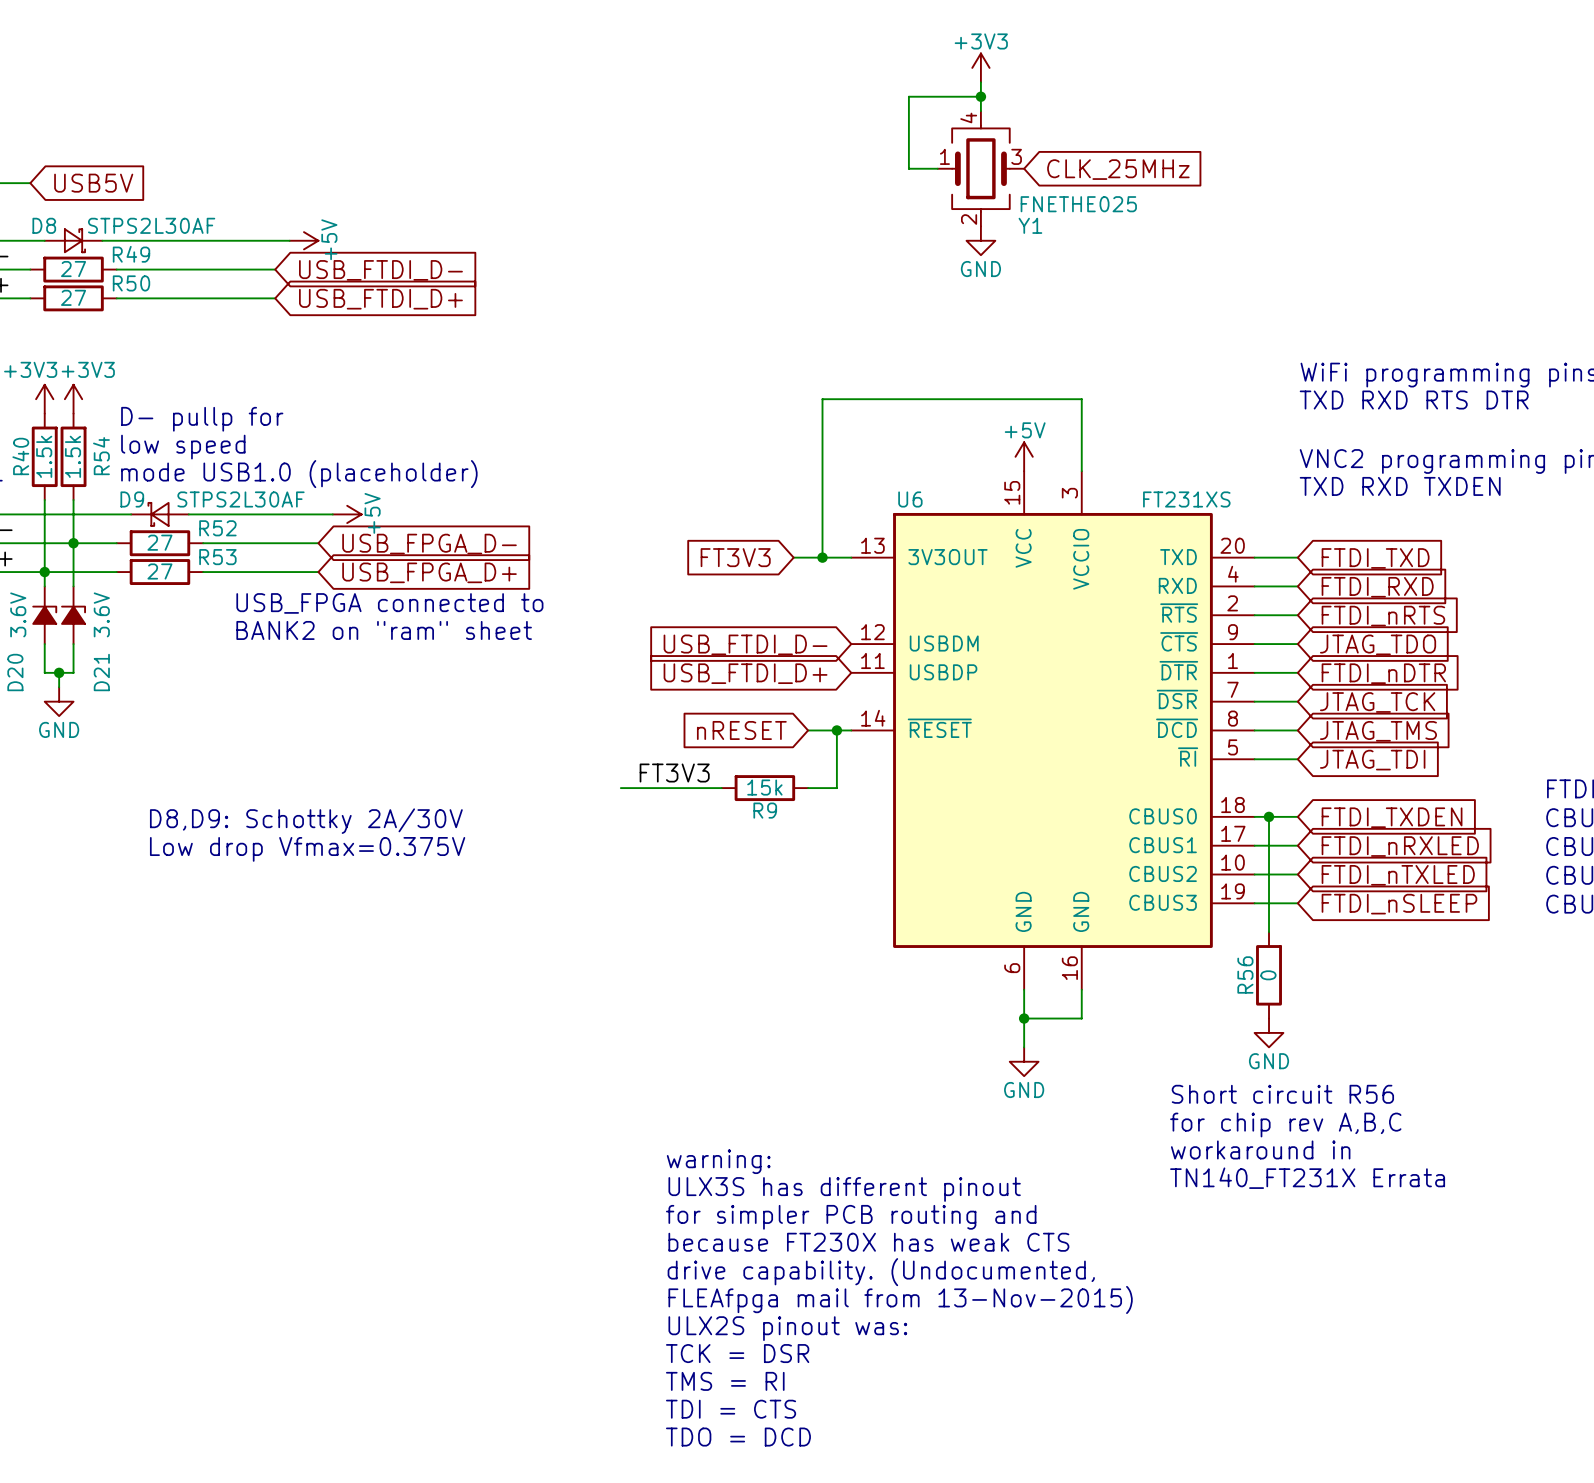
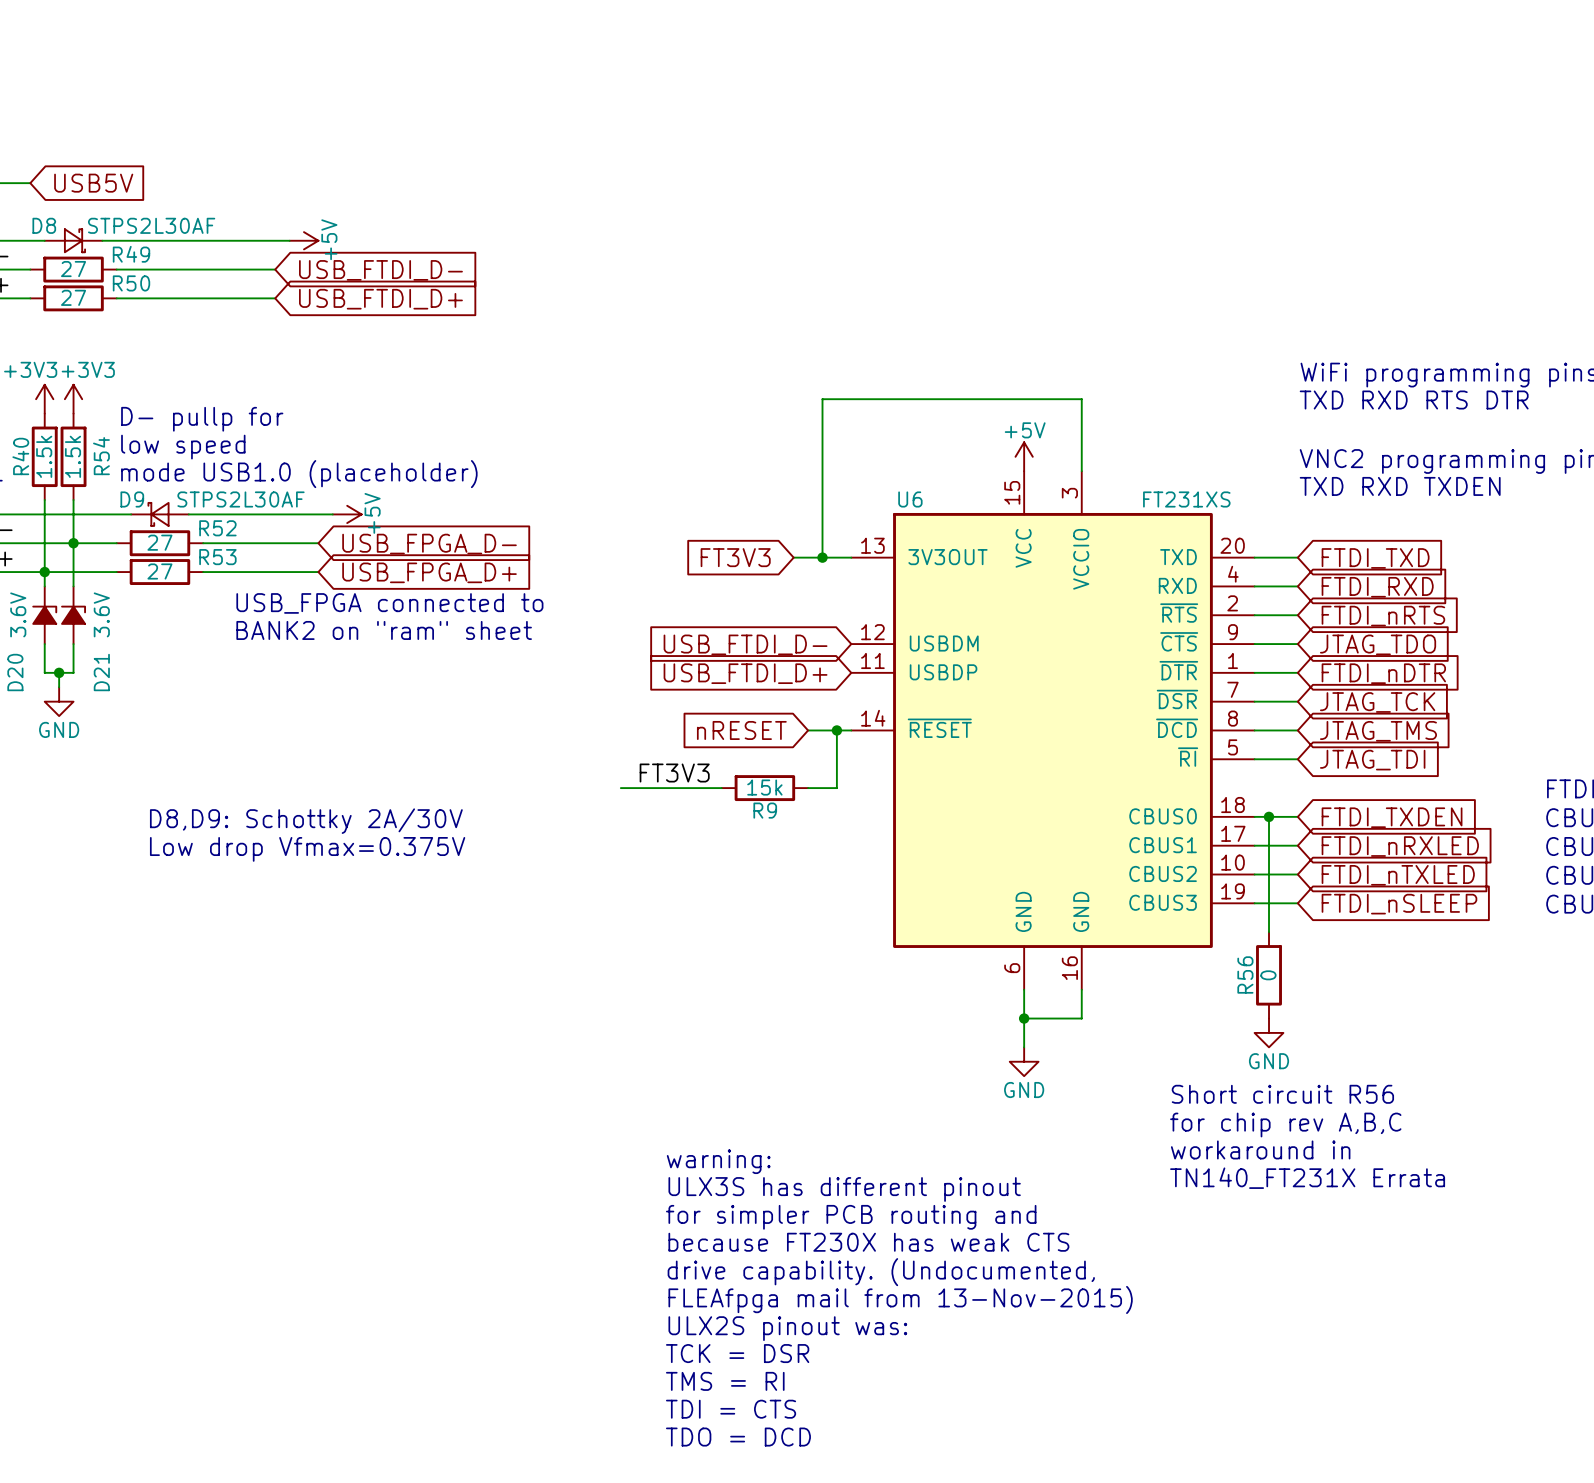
power symbol: +3V3 (980, 67) -> none
wire: (980, 82) (980, 111) -> none
wire: (980, 96) (908, 96) (908, 168) (937, 168) -> none
junction: (980, 96) -> none
Y1: FNETHE025 (980, 168) -> none
global label: CLK_25MHz (1118, 169) -> none
power symbol: GND (980, 240) -> none

